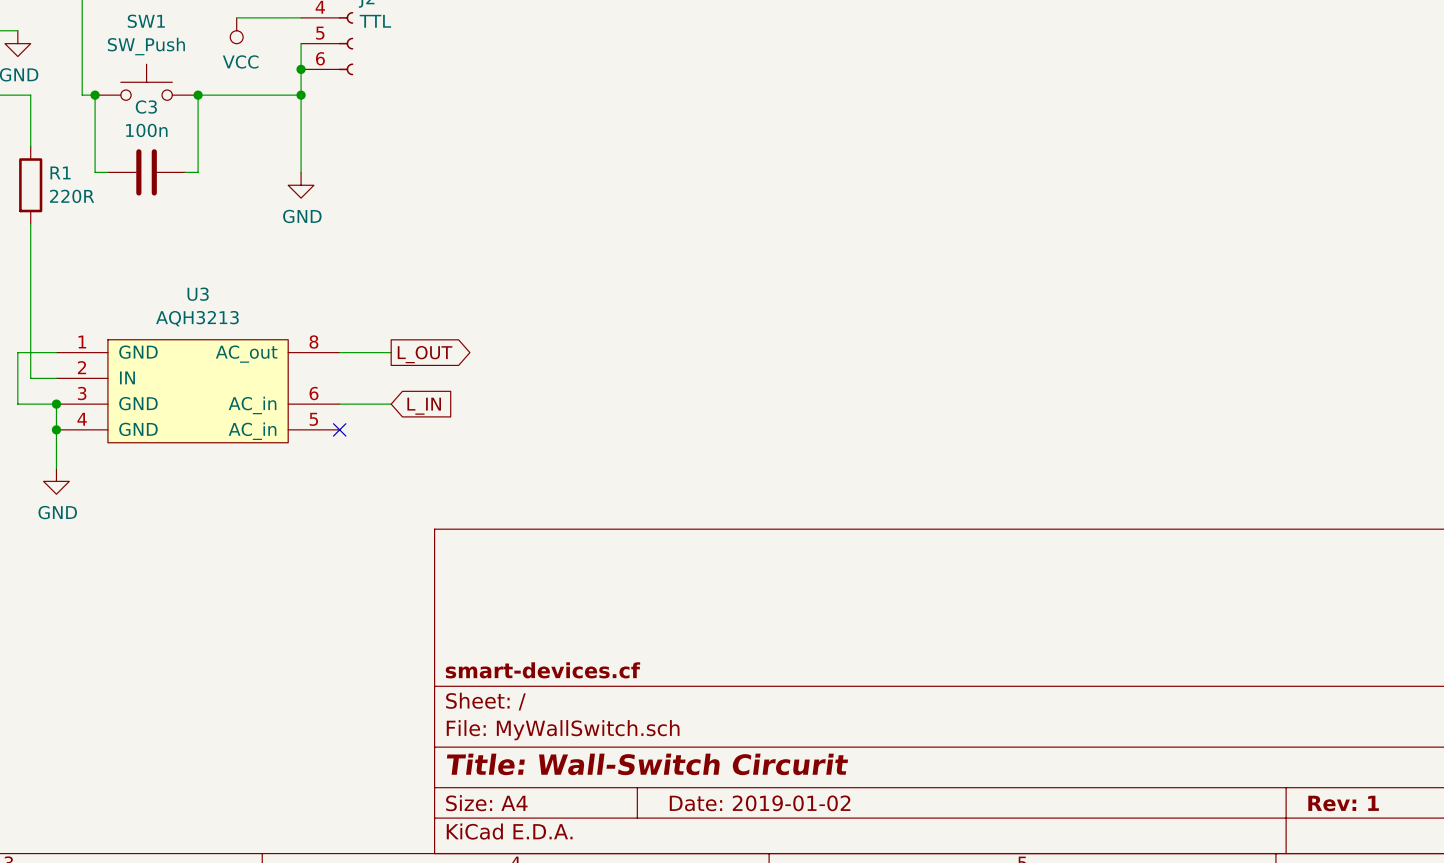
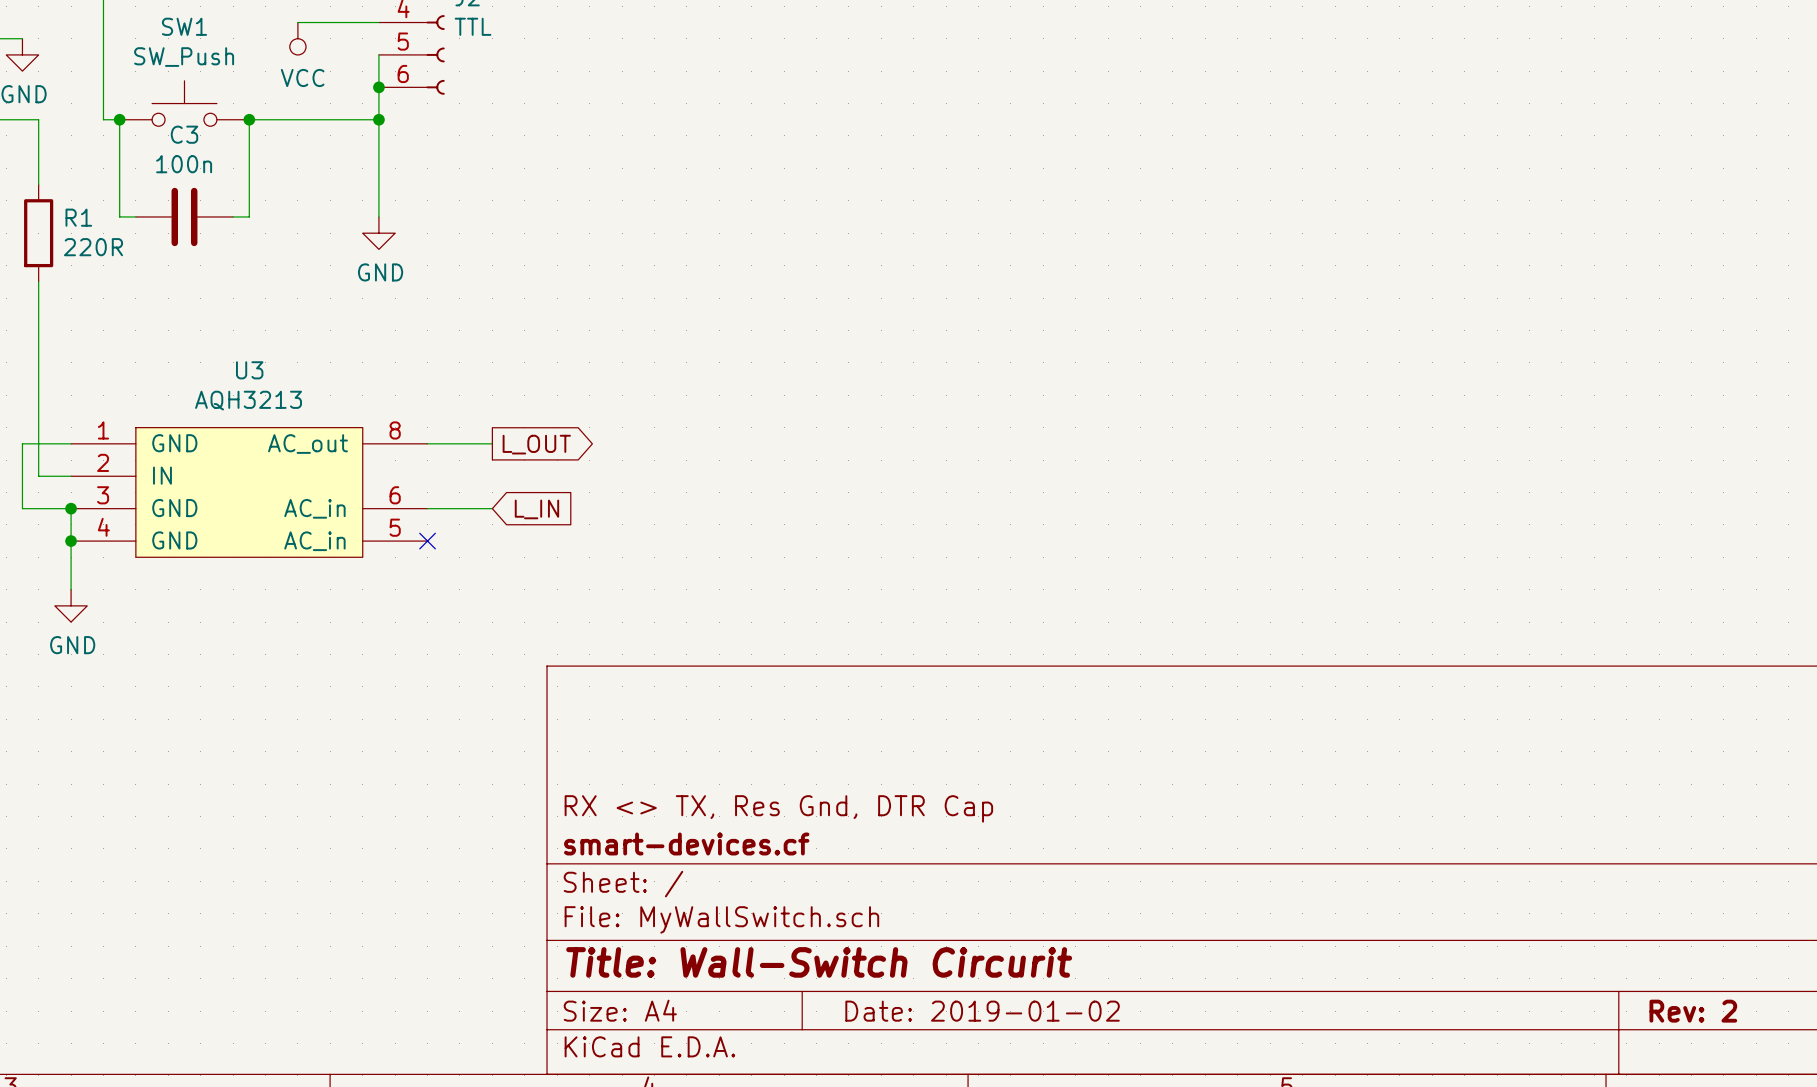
title block: none -> RX <> TX, Res Gnd, DTR Cap (778, 808)
title block: Rev: 1 (1343, 803) -> Rev: 2 (1693, 1011)

